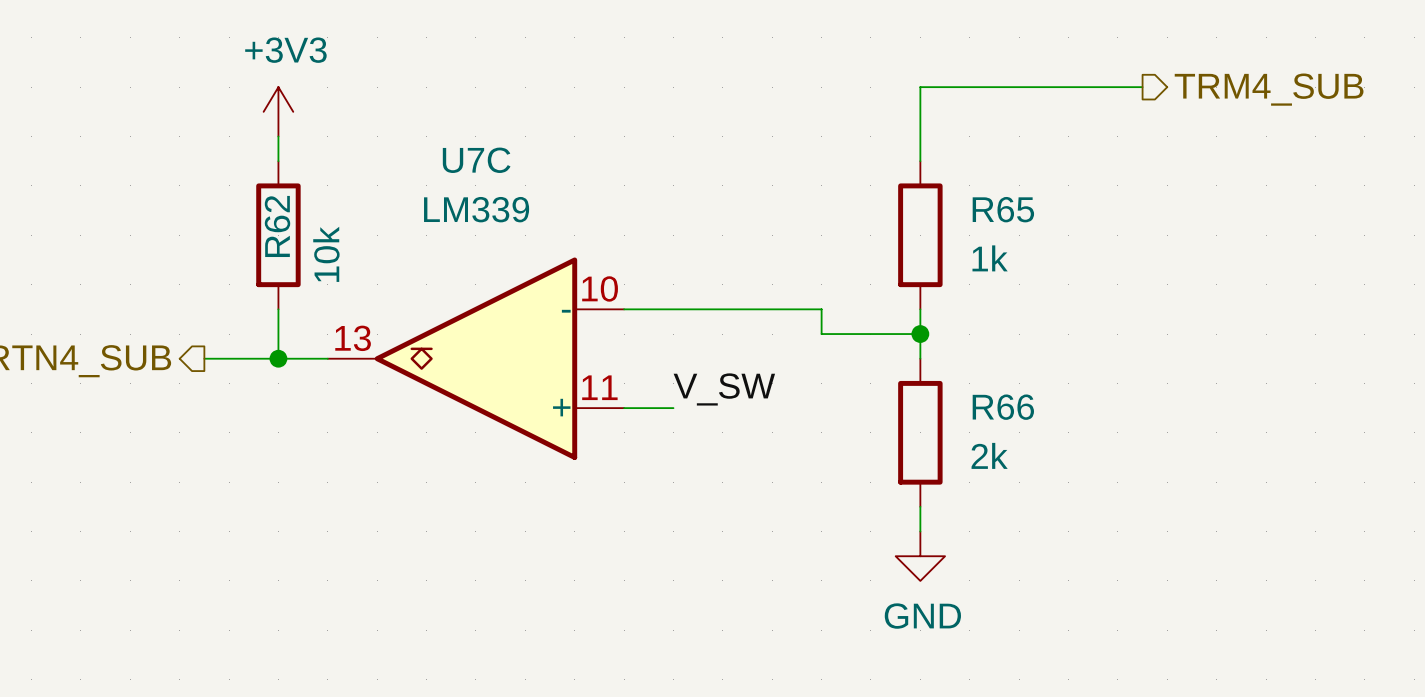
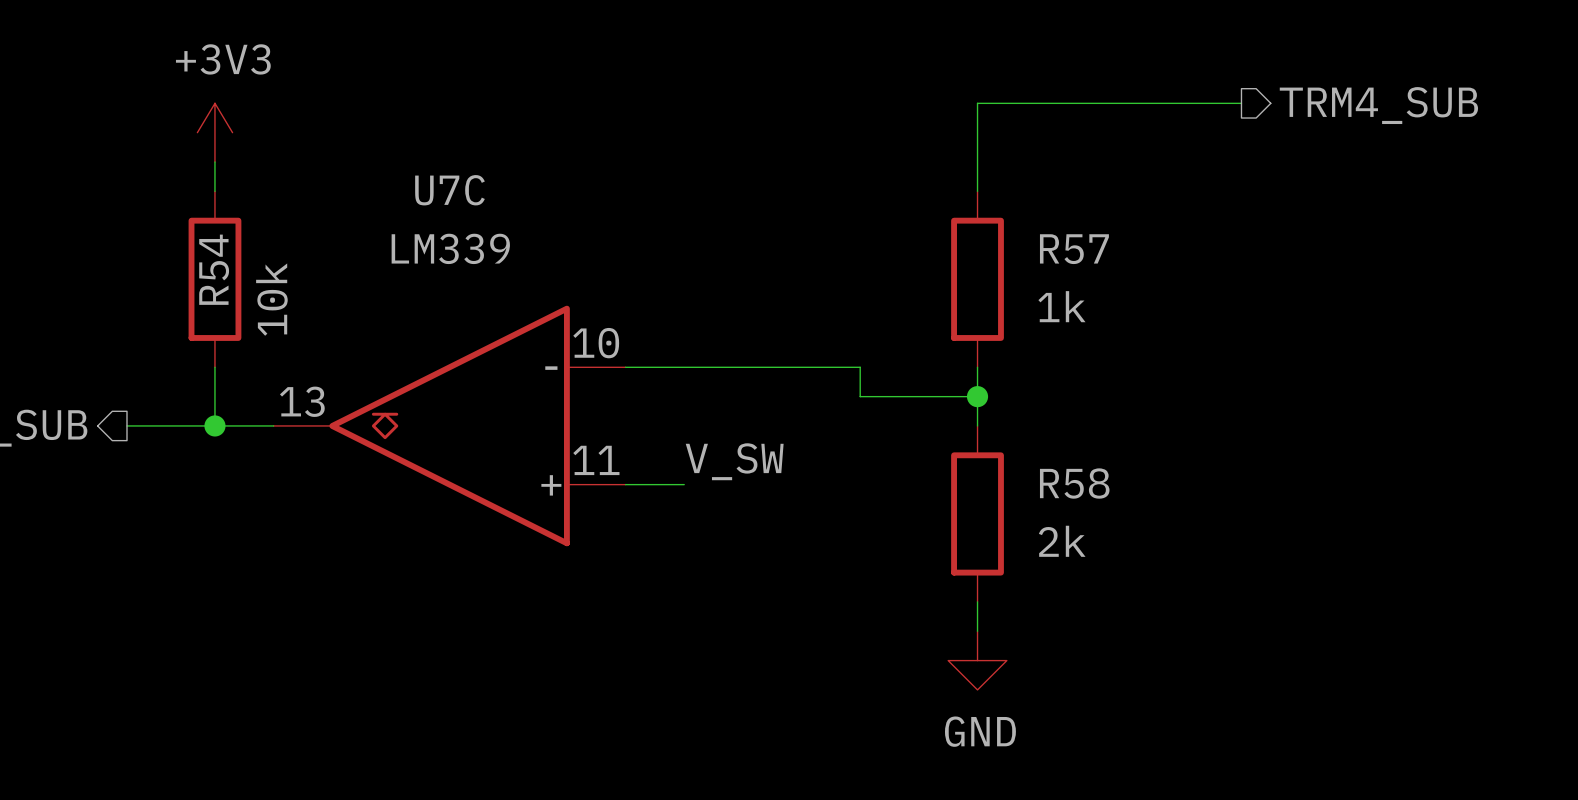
R65 name: R65 (1003, 209) -> R57 (1074, 249)
R62 name: R62 (277, 226) -> R54 (214, 269)
R66 name: R66 (1003, 407) -> R58 (1074, 483)

